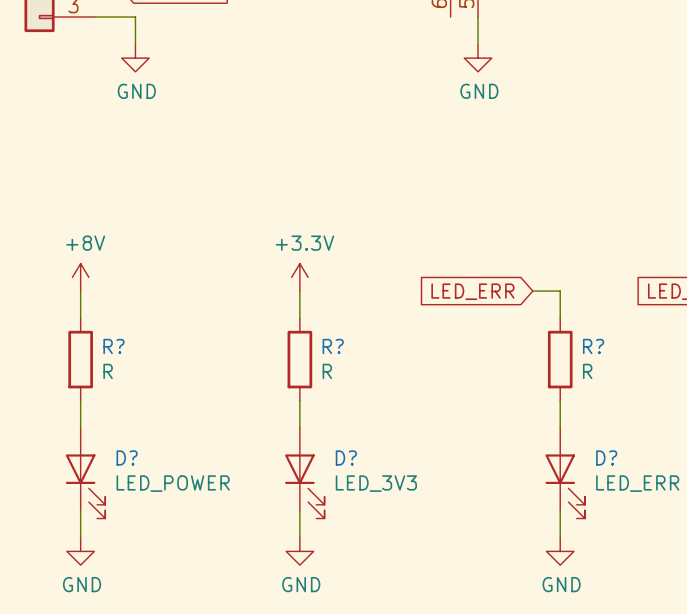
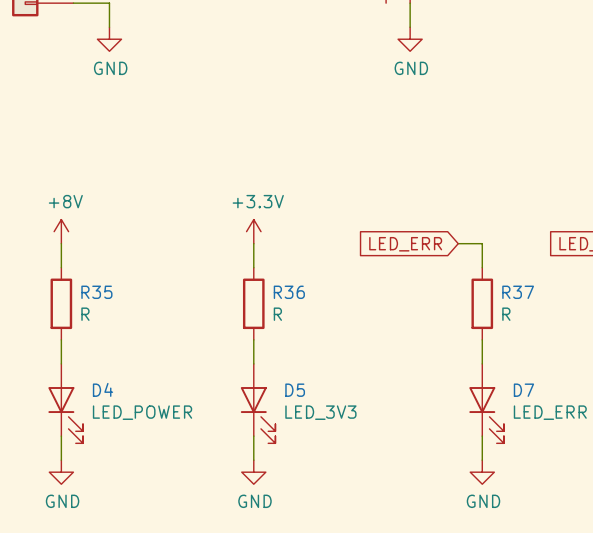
R? name: R? (113, 346) -> R35 (96, 292)
R? name: R? (333, 346) -> R36 (289, 292)
R? name: R? (593, 346) -> R37 (518, 292)
D? name: D? (127, 457) -> D4 (103, 389)
D? name: D? (346, 457) -> D5 (295, 390)
D? name: D? (606, 457) -> D7 (523, 390)

